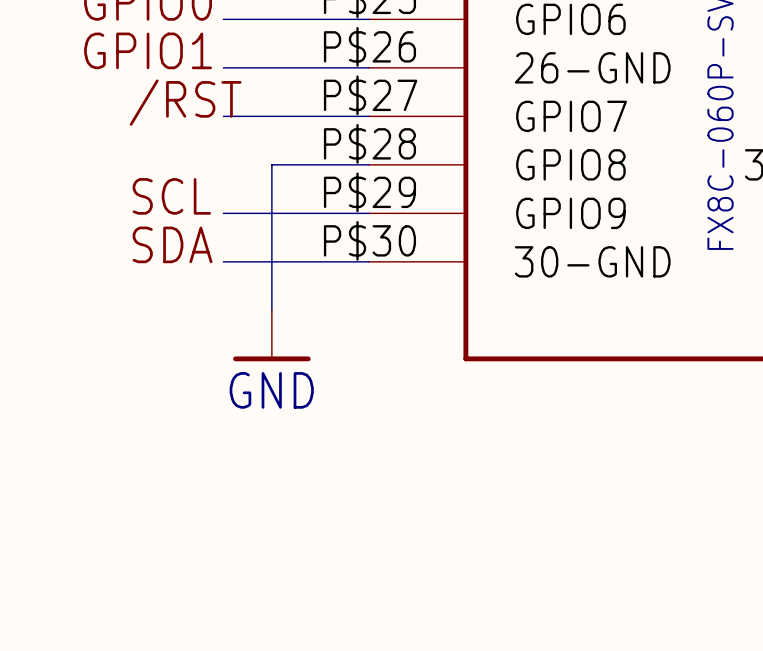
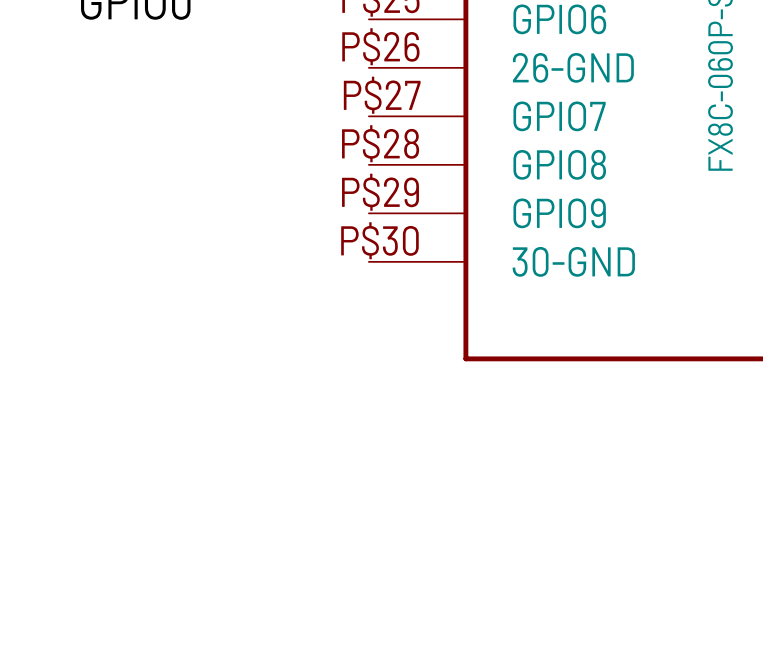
wire: (223, 19) (368, 19) -> none
label: GPIO1 (148, 50) -> none
wire: (223, 67) (368, 67) -> none
label: /RST (185, 102) -> none
wire: (223, 116) (368, 116) -> none
wire: (368, 164) (271, 164) (271, 310) -> none
label: SCL (171, 196) -> none
wire: (223, 213) (368, 213) -> none
label: SDA (172, 244) -> none
wire: (223, 261) (368, 261) -> none
power symbol: GND (271, 335) -> none

